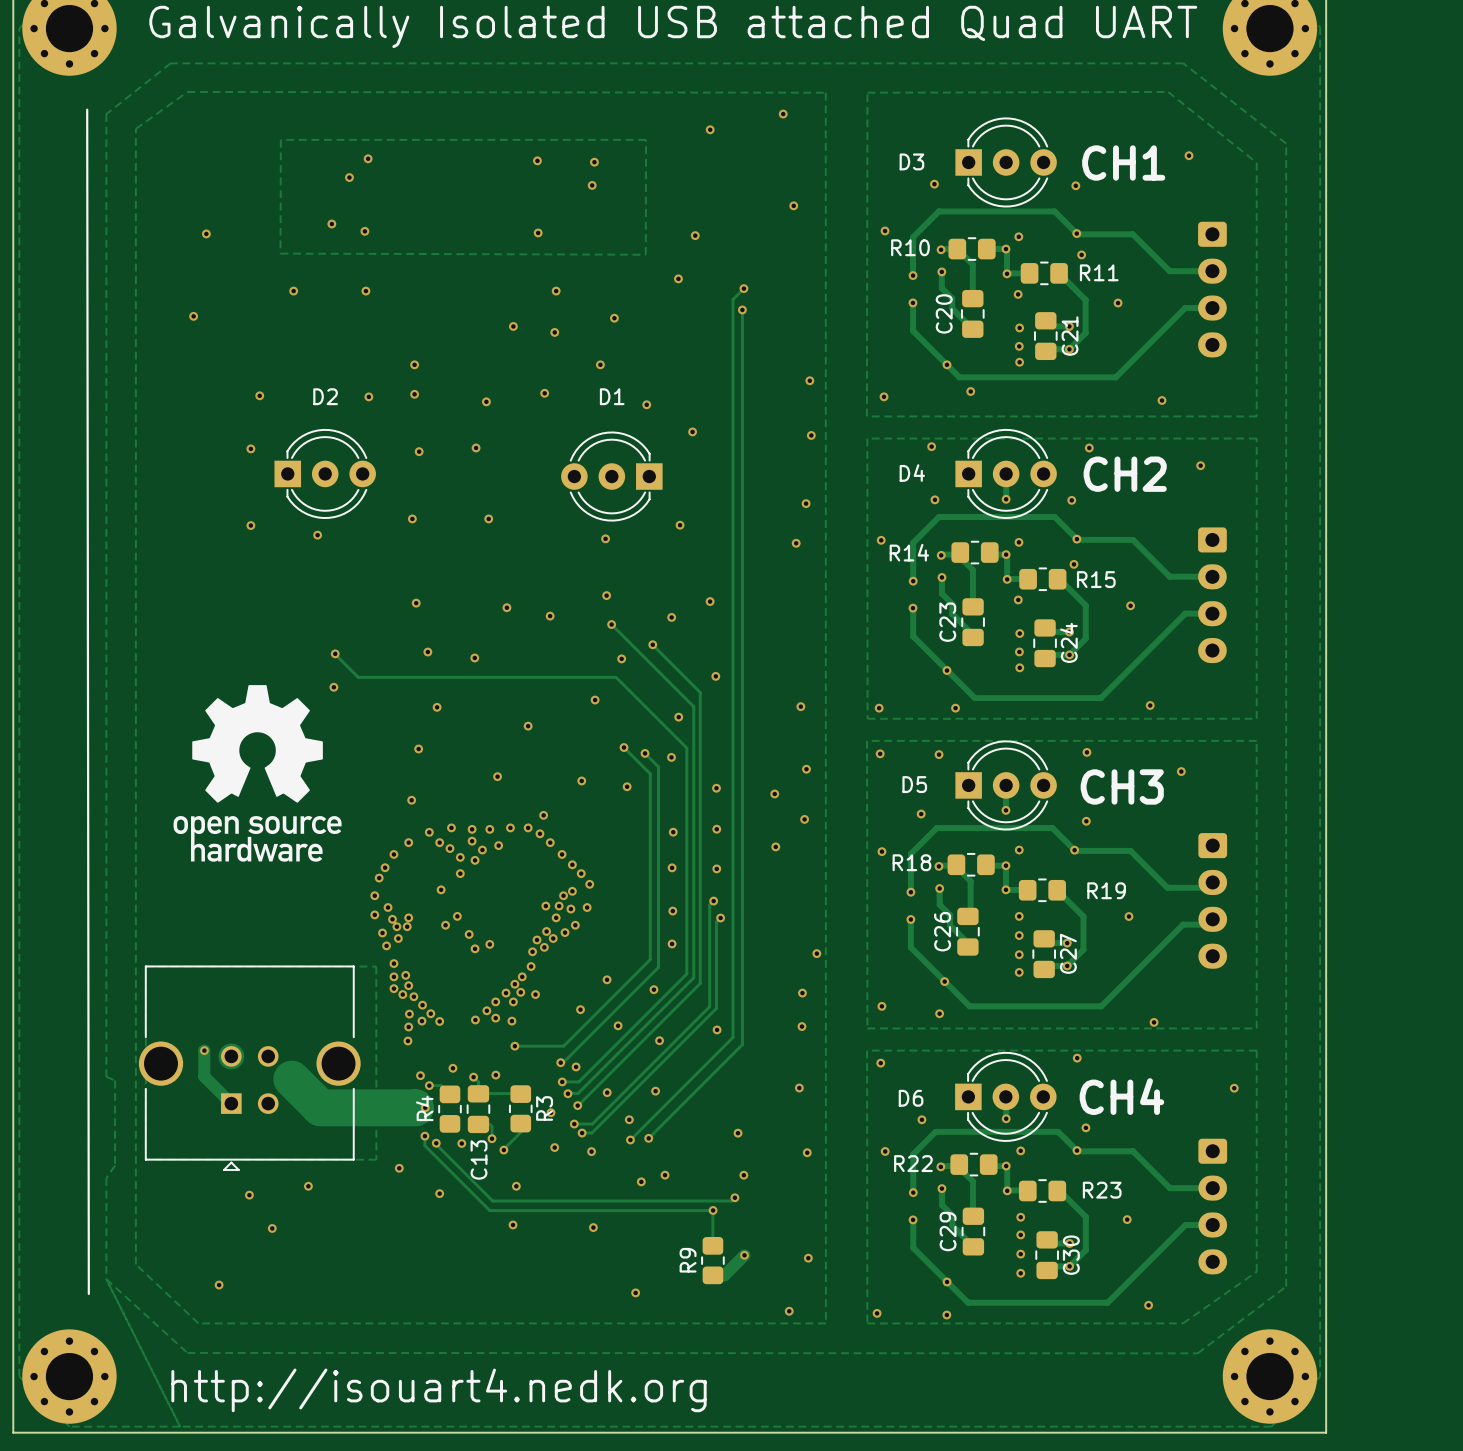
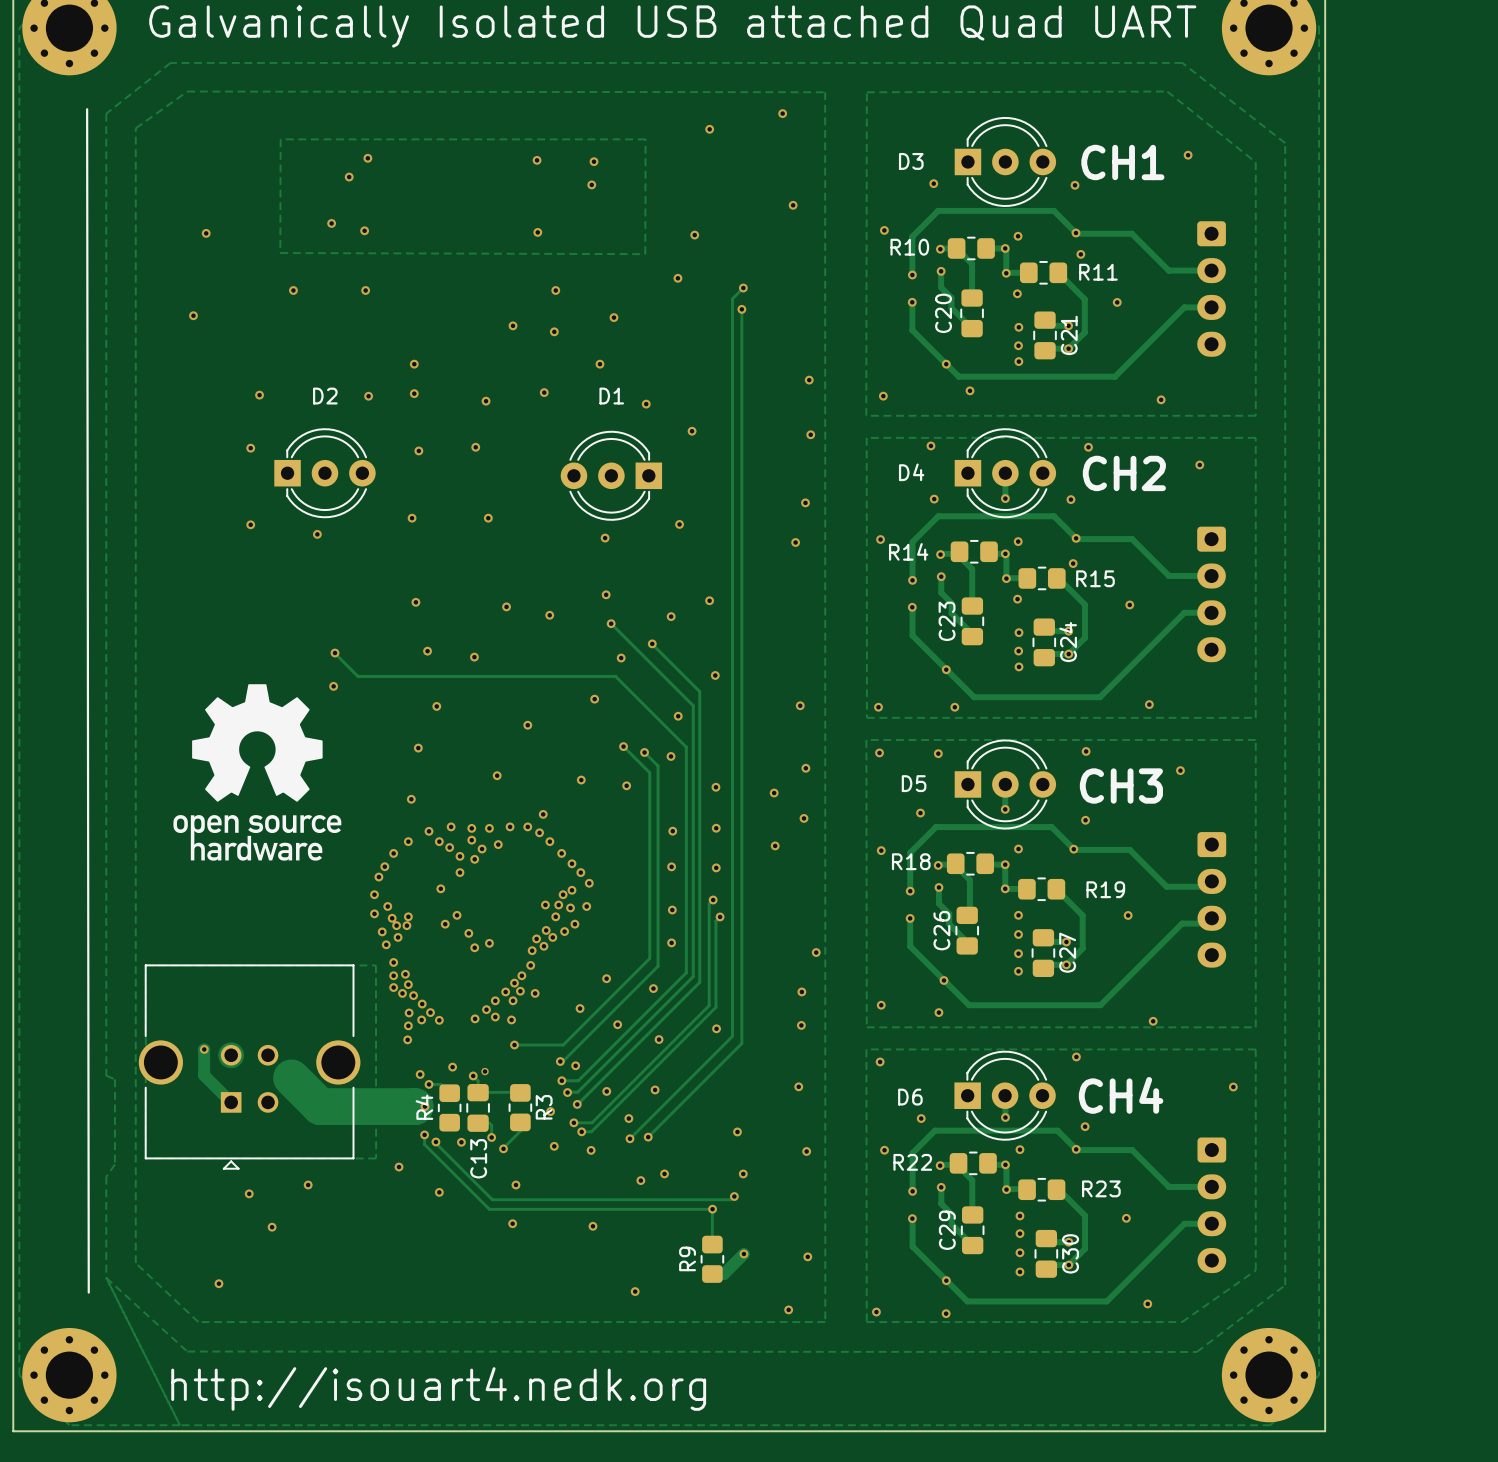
via: none -> (485, 1071)
via: (495, 1075) -> none

